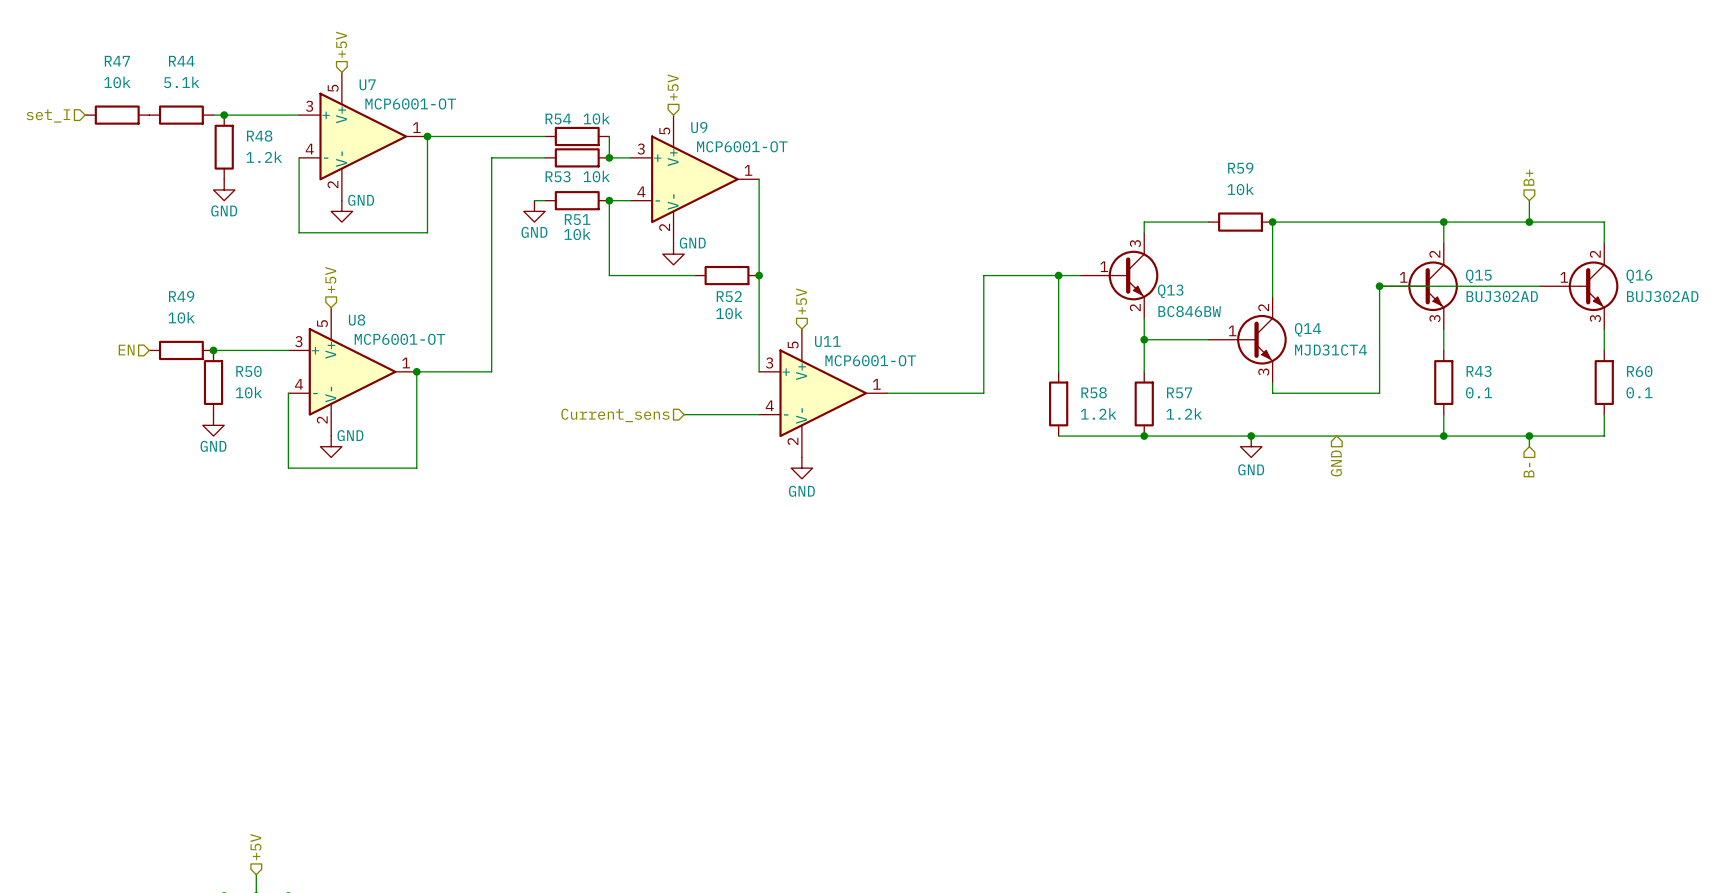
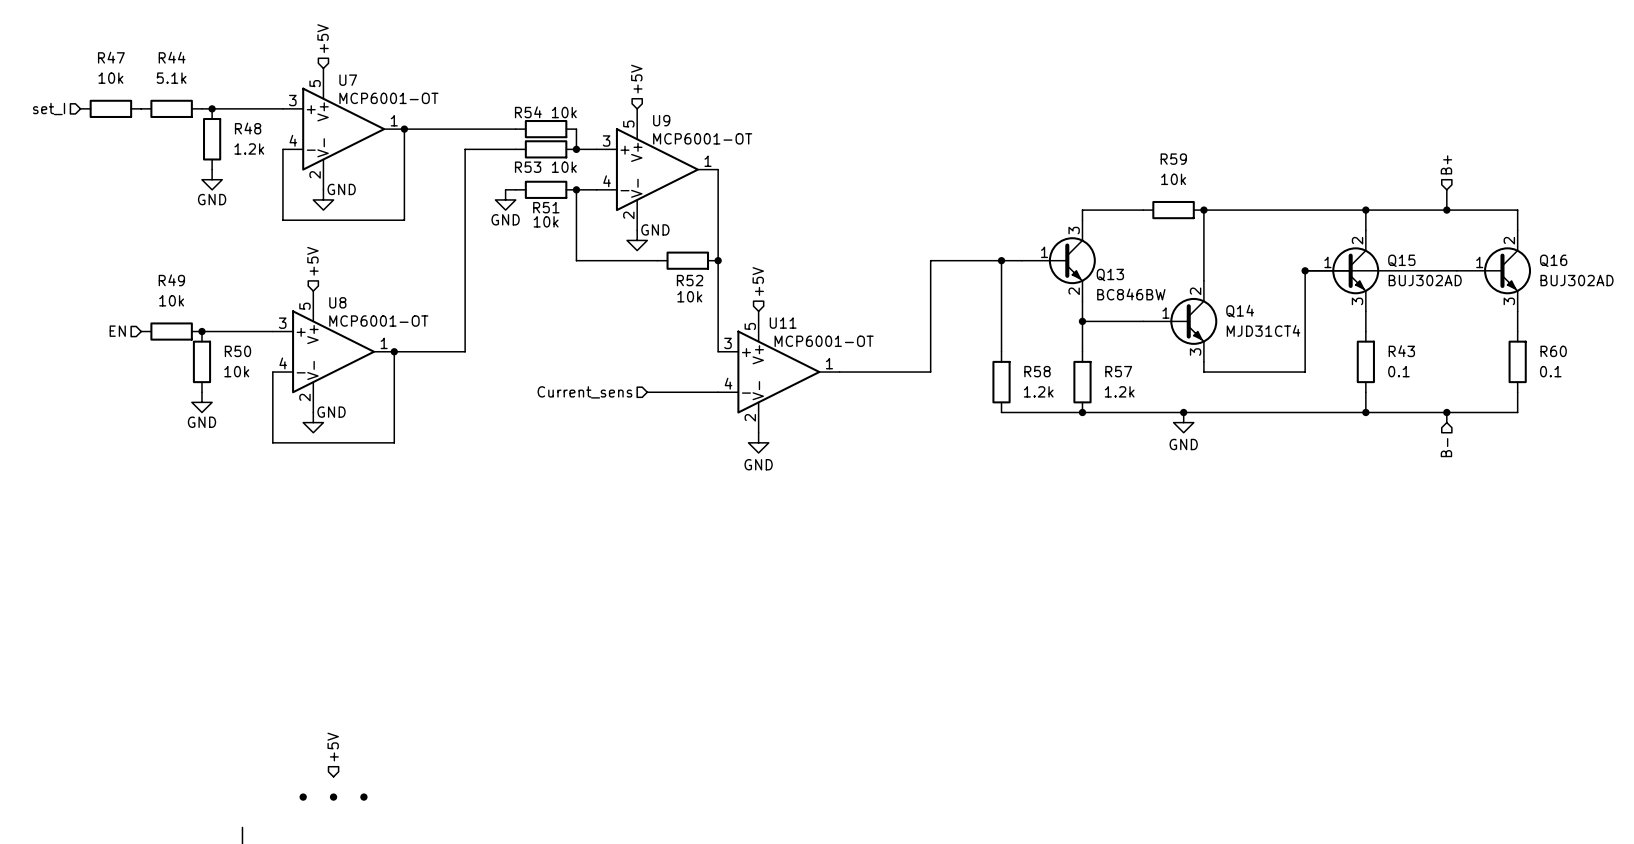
hierarchical label: GND (1336, 463) -> none
junction: none -> (303, 797)
junction: none -> (333, 797)
junction: none -> (363, 797)
hierarchical label position: +5V (255, 847) -> +5V (333, 747)

